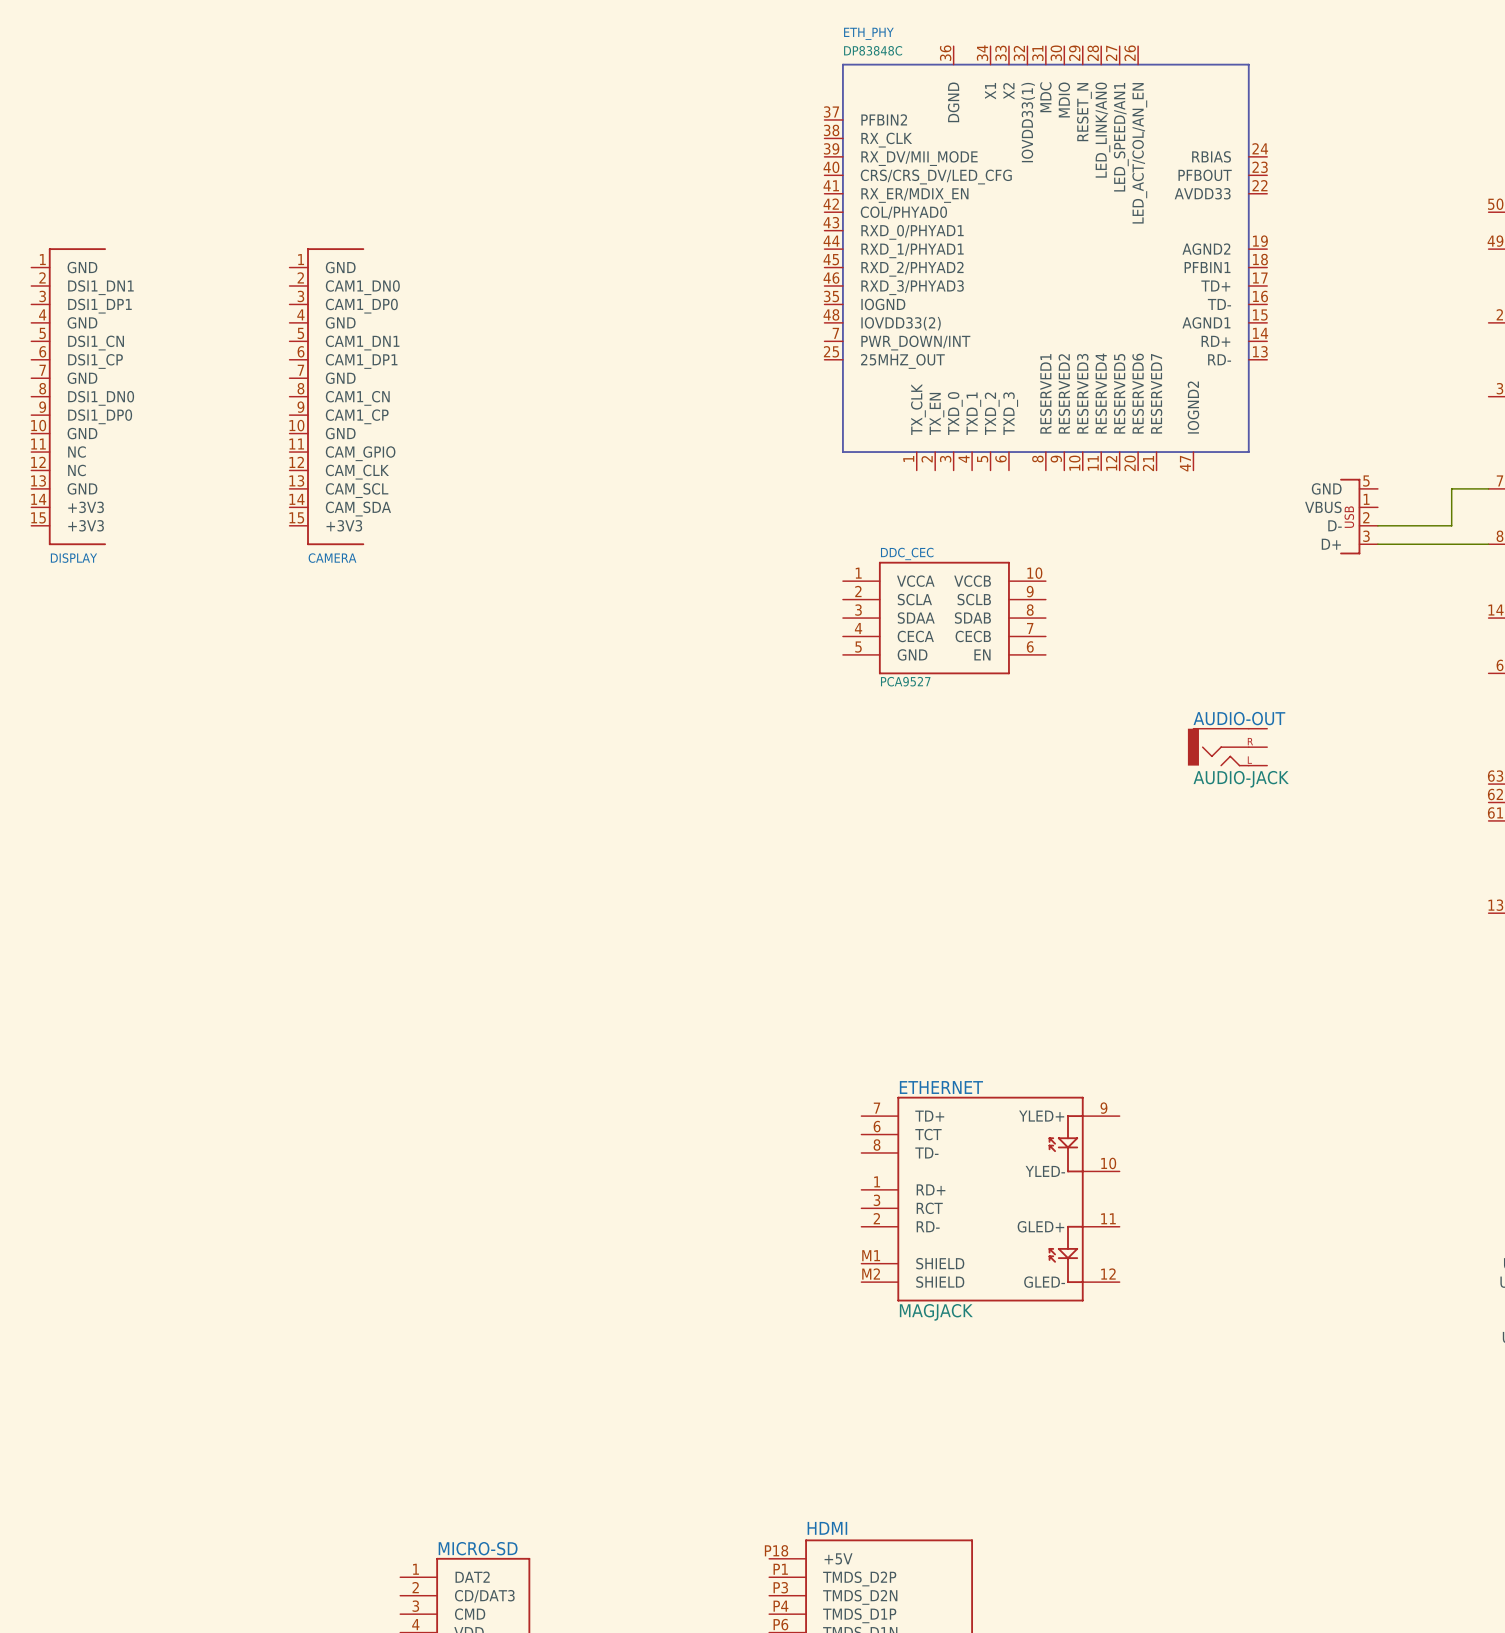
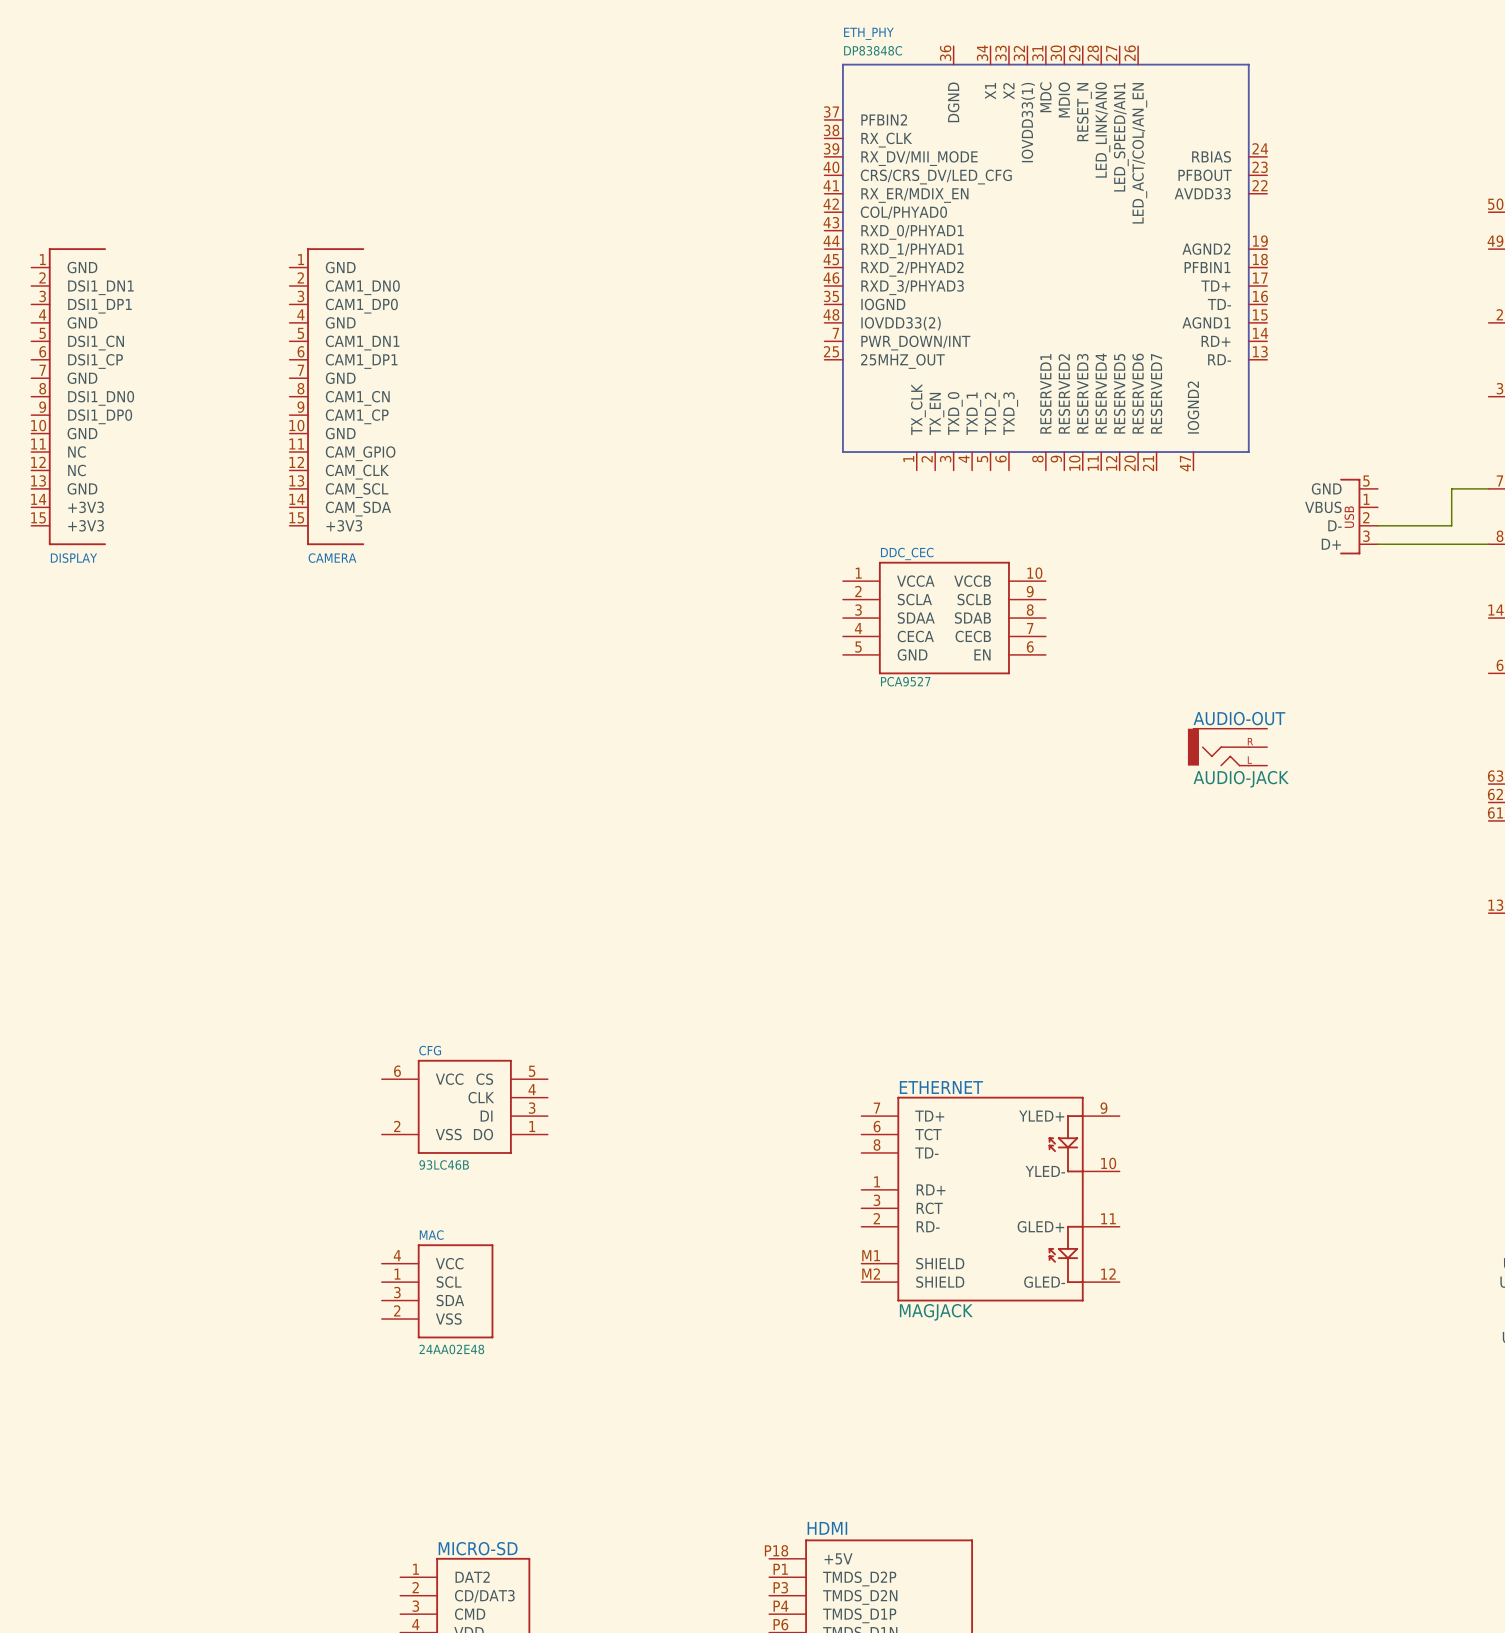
CFG: none -> 93LC46B (464, 1106)
MAC: none -> 24AA02E48 (437, 1291)

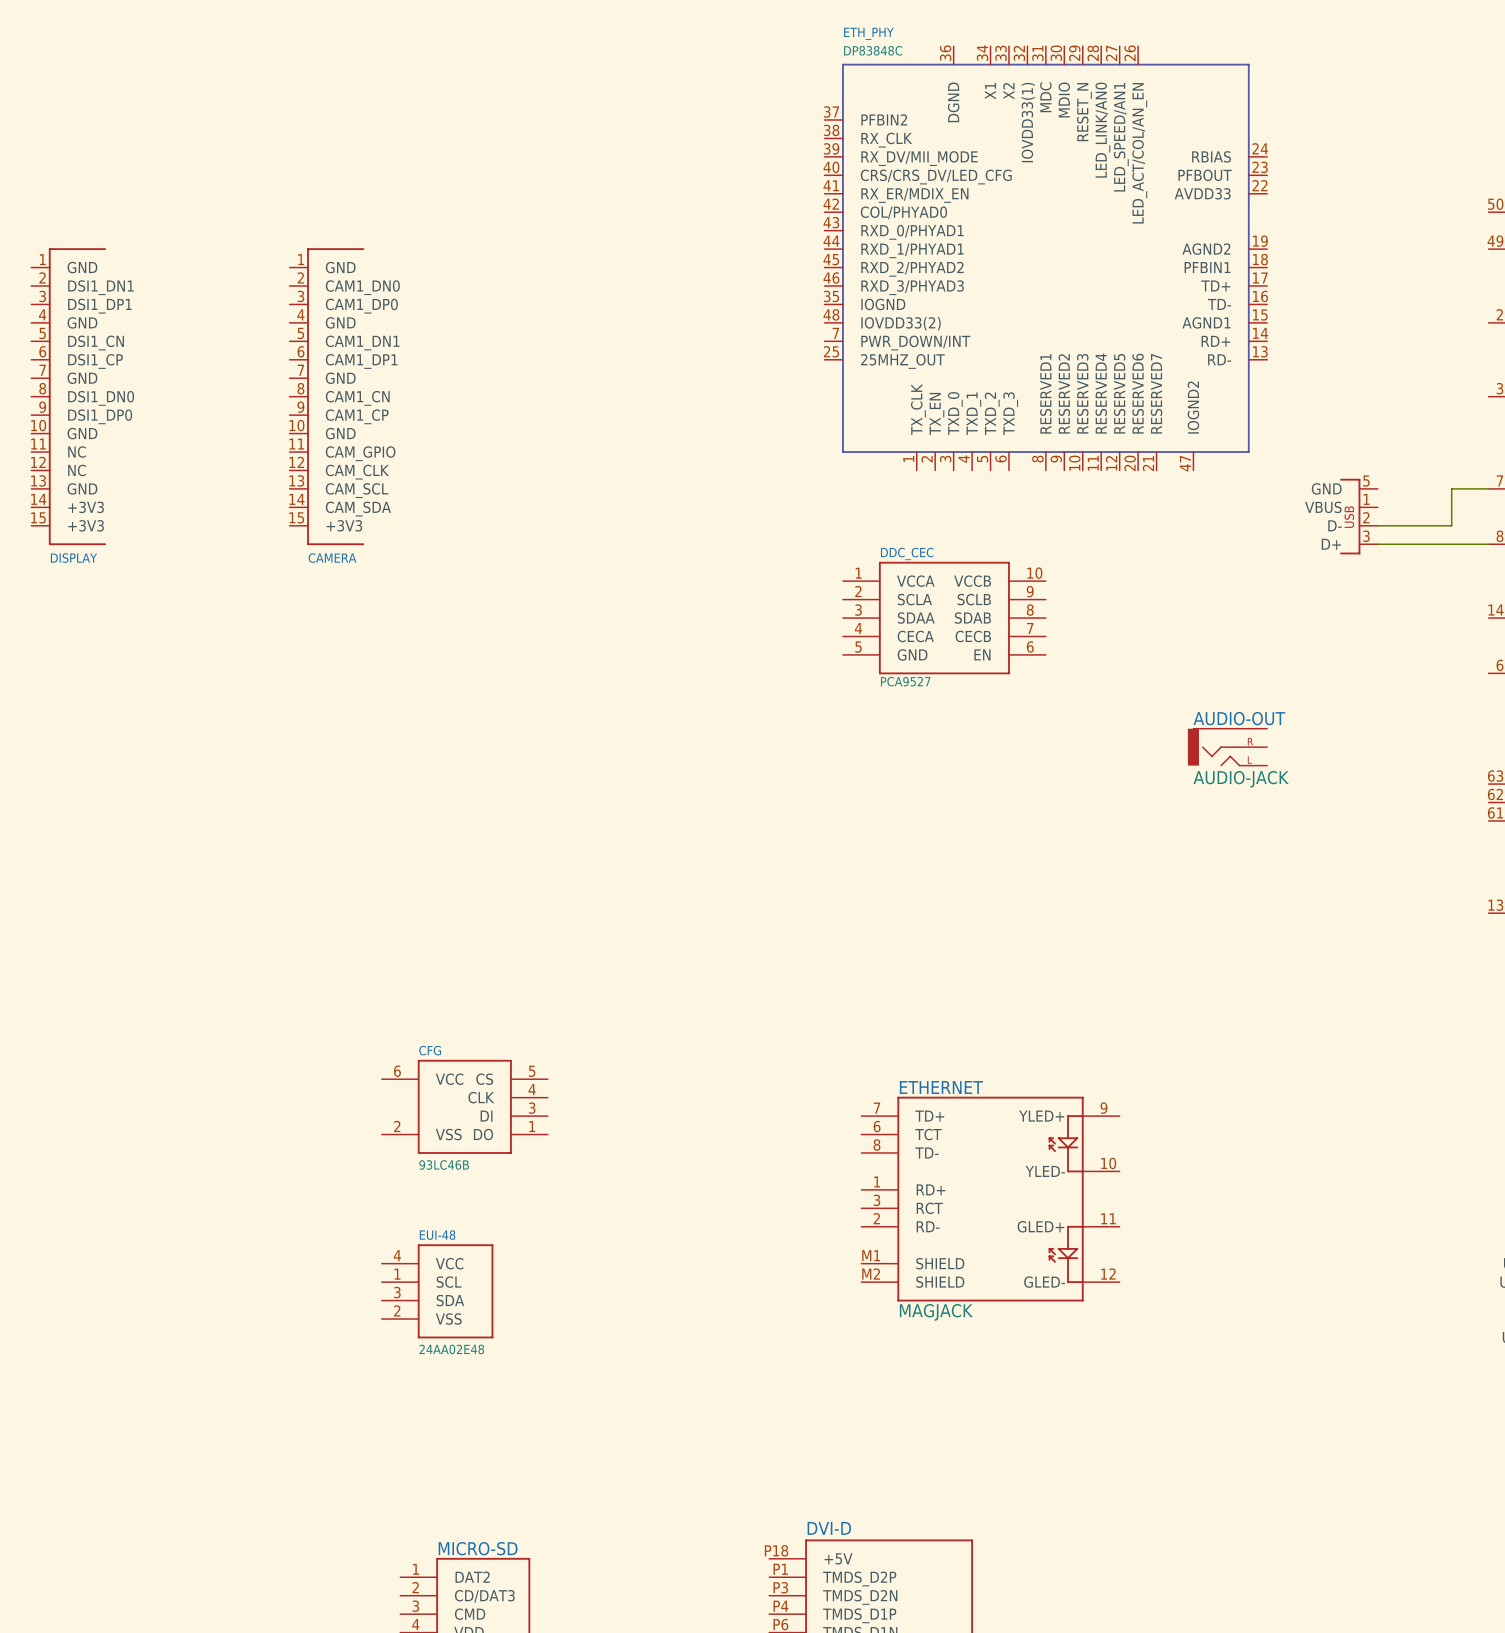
MAC name: MAC (431, 1235) -> EUI-48 (437, 1235)
HDMI name: HDMI (827, 1528) -> DVI-D (829, 1528)

